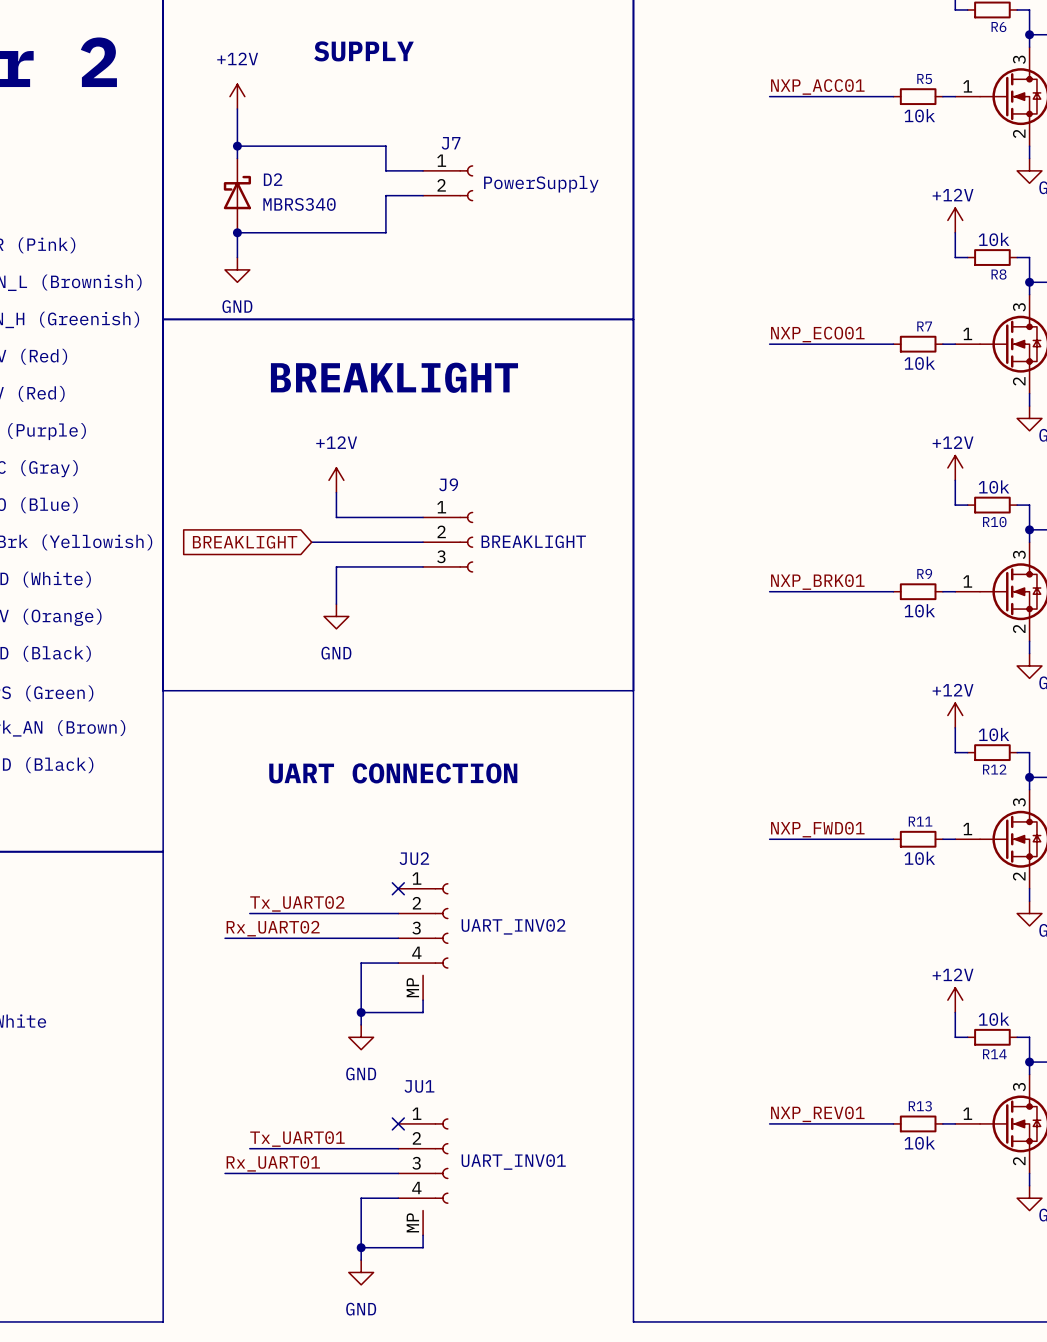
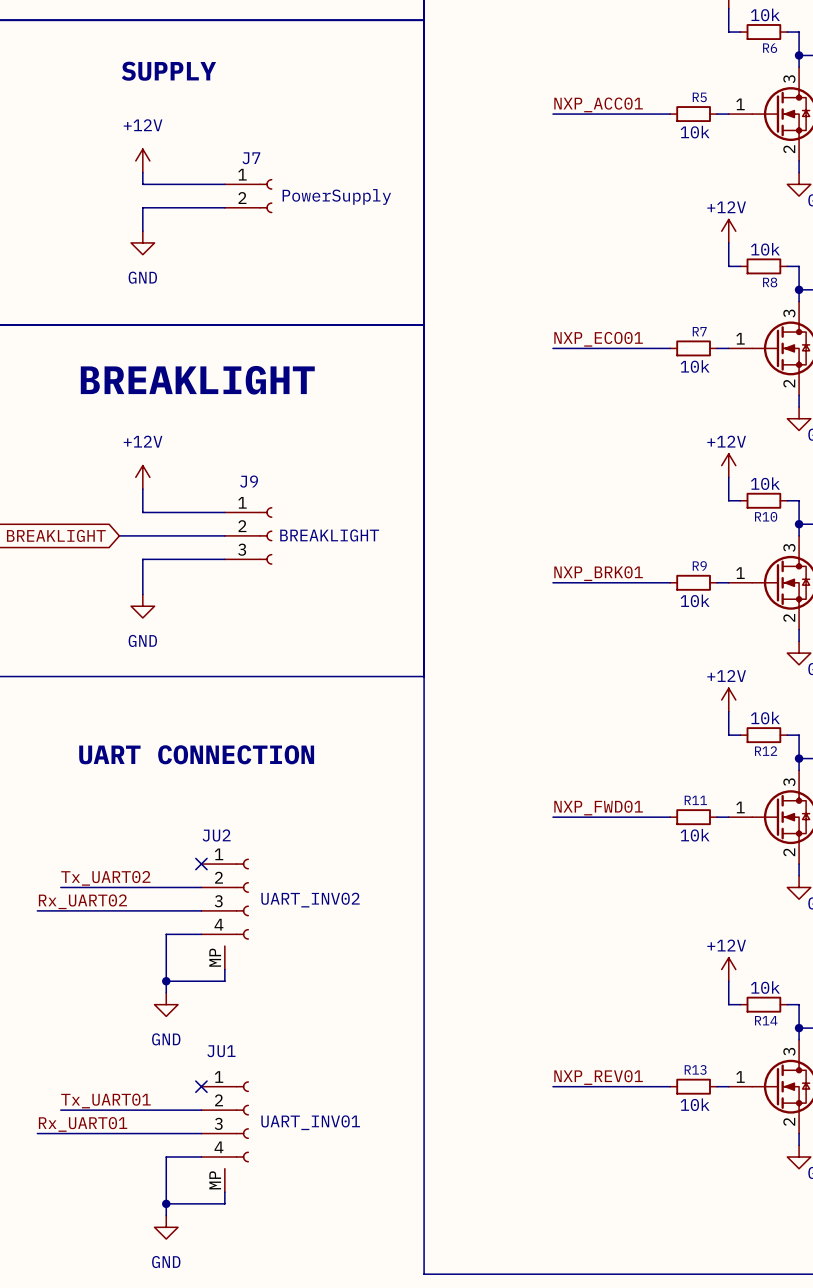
power symbol position: +12V (237, 96) -> +12V (142, 160)
wire: (237, 109) (237, 158) -> none
wire: (237, 146) (385, 146) (385, 170) -> (142, 172) (142, 184) (189, 184)
junction: (237, 146) -> none
D2: MBRS340 (237, 195) -> none
wire: (385, 195) (385, 232) (237, 232) (237, 257) -> (189, 207) (142, 207) (142, 231)
junction: (237, 232) -> none
power symbol position: GND (237, 269) -> GND (142, 242)

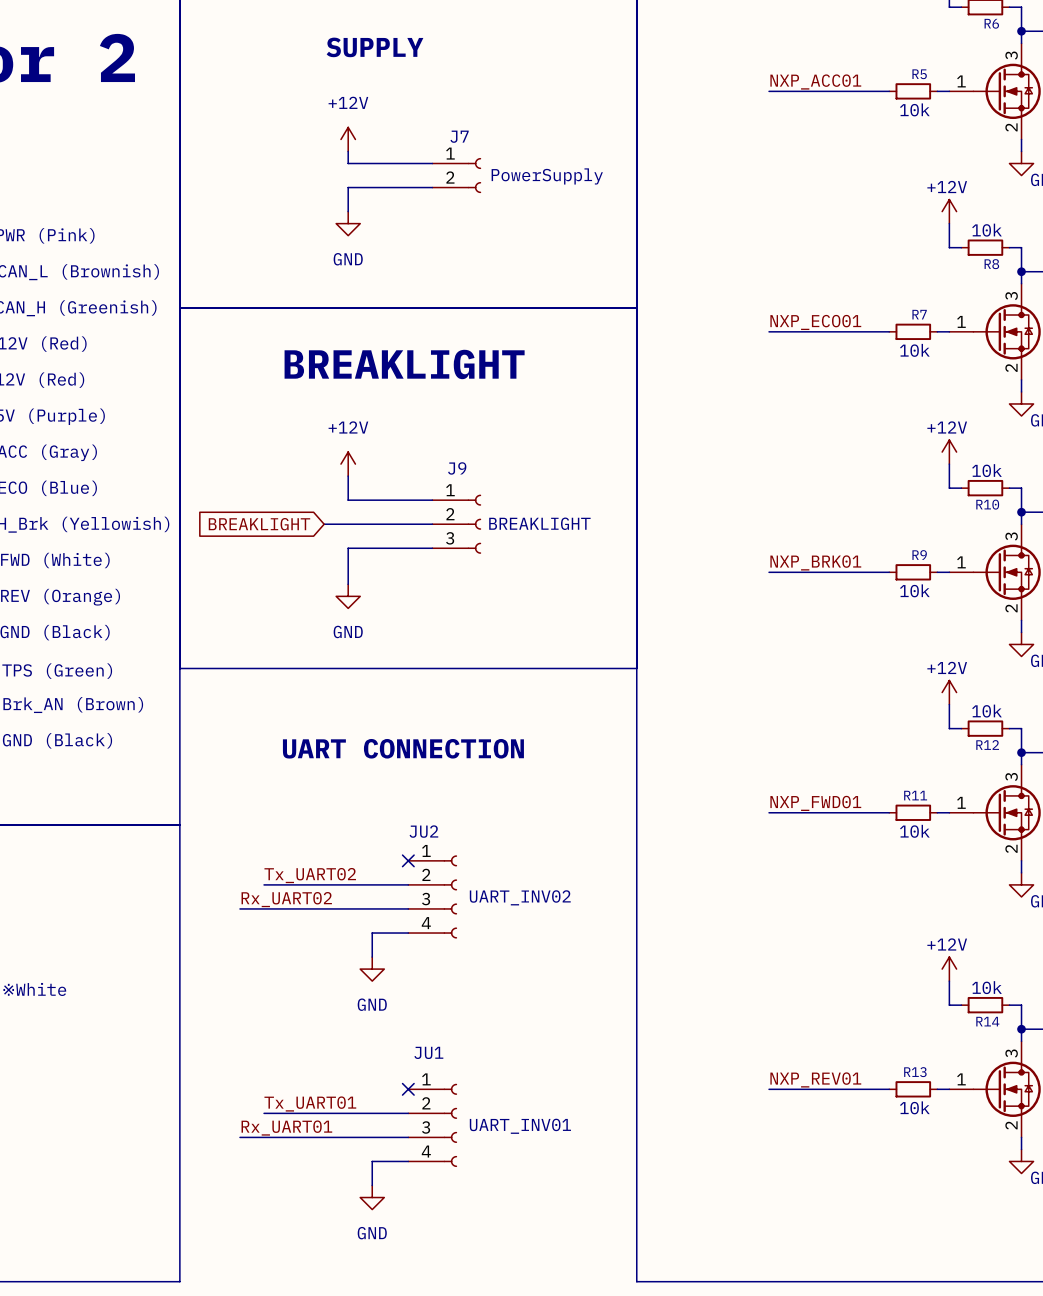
JU2 symbol: [201, 858, 249, 970] -> [408, 855, 458, 939]
wire: (166, 957) (166, 992) -> none
wire: (224, 969) (224, 981) (166, 981) -> none
junction: (166, 981) -> none
power symbol position: GND (166, 1004) -> GND (372, 969)
JU1 symbol: [201, 1081, 249, 1193] -> [408, 1083, 458, 1167]
wire: (166, 1180) (166, 1215) -> none
wire: (224, 1192) (224, 1203) (166, 1203) -> none
junction: (166, 1203) -> none
power symbol position: GND (166, 1227) -> GND (372, 1197)

